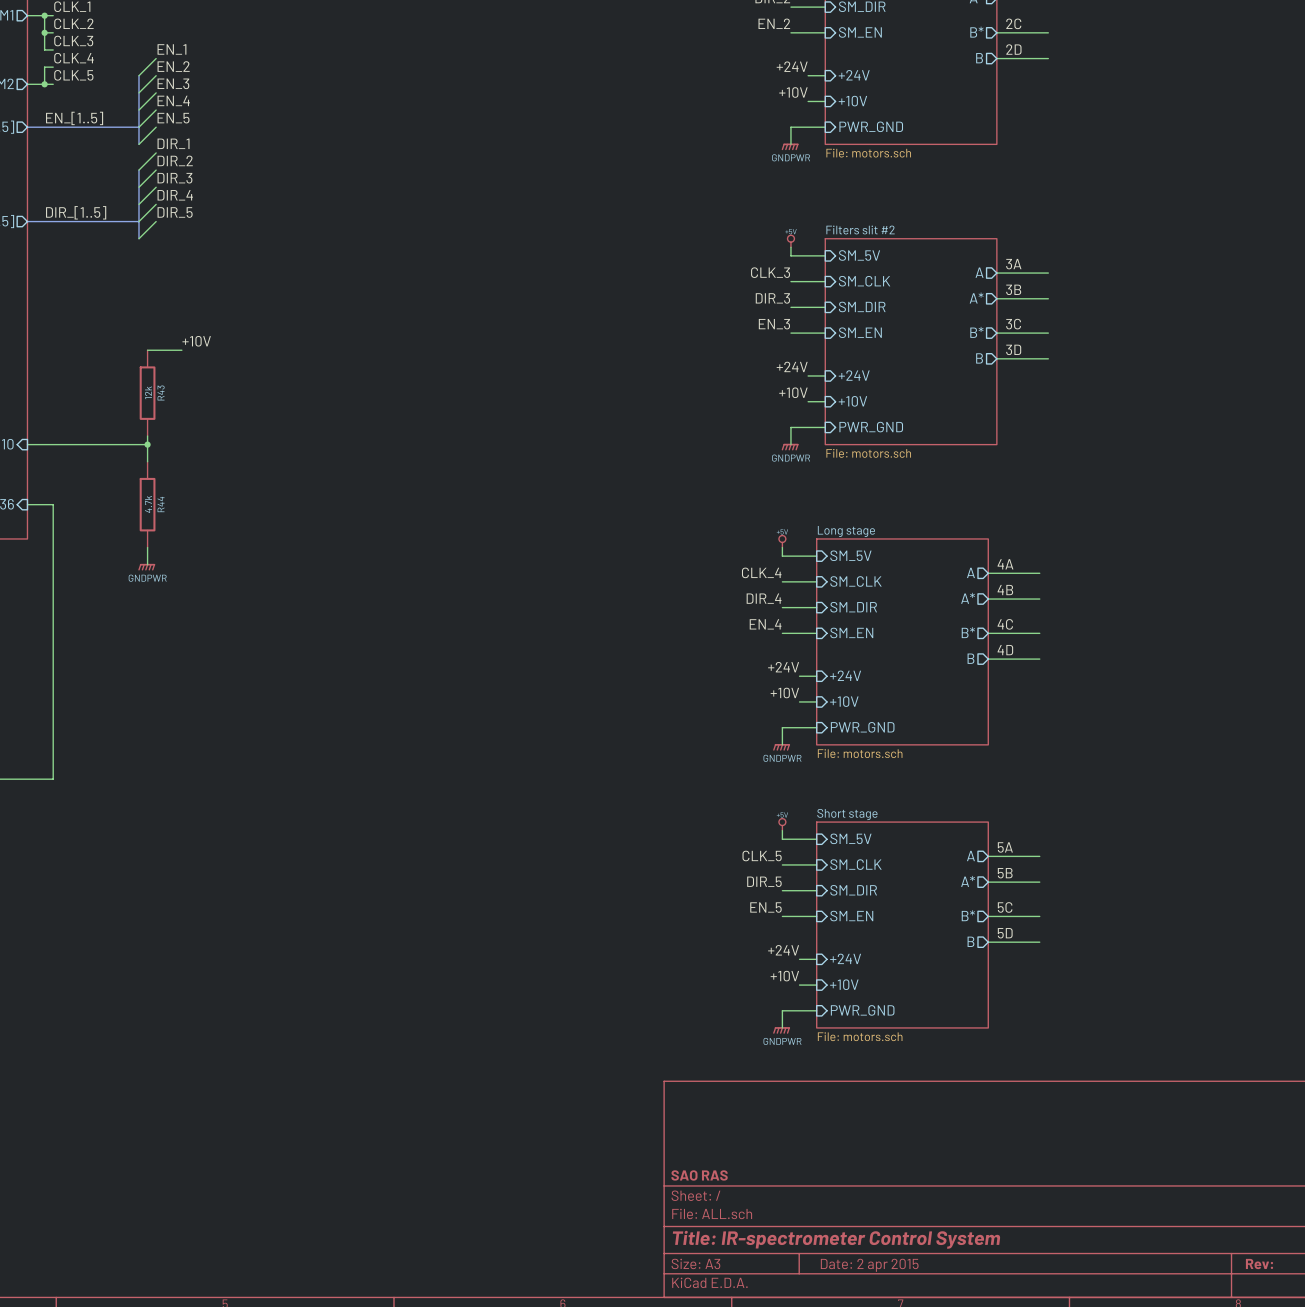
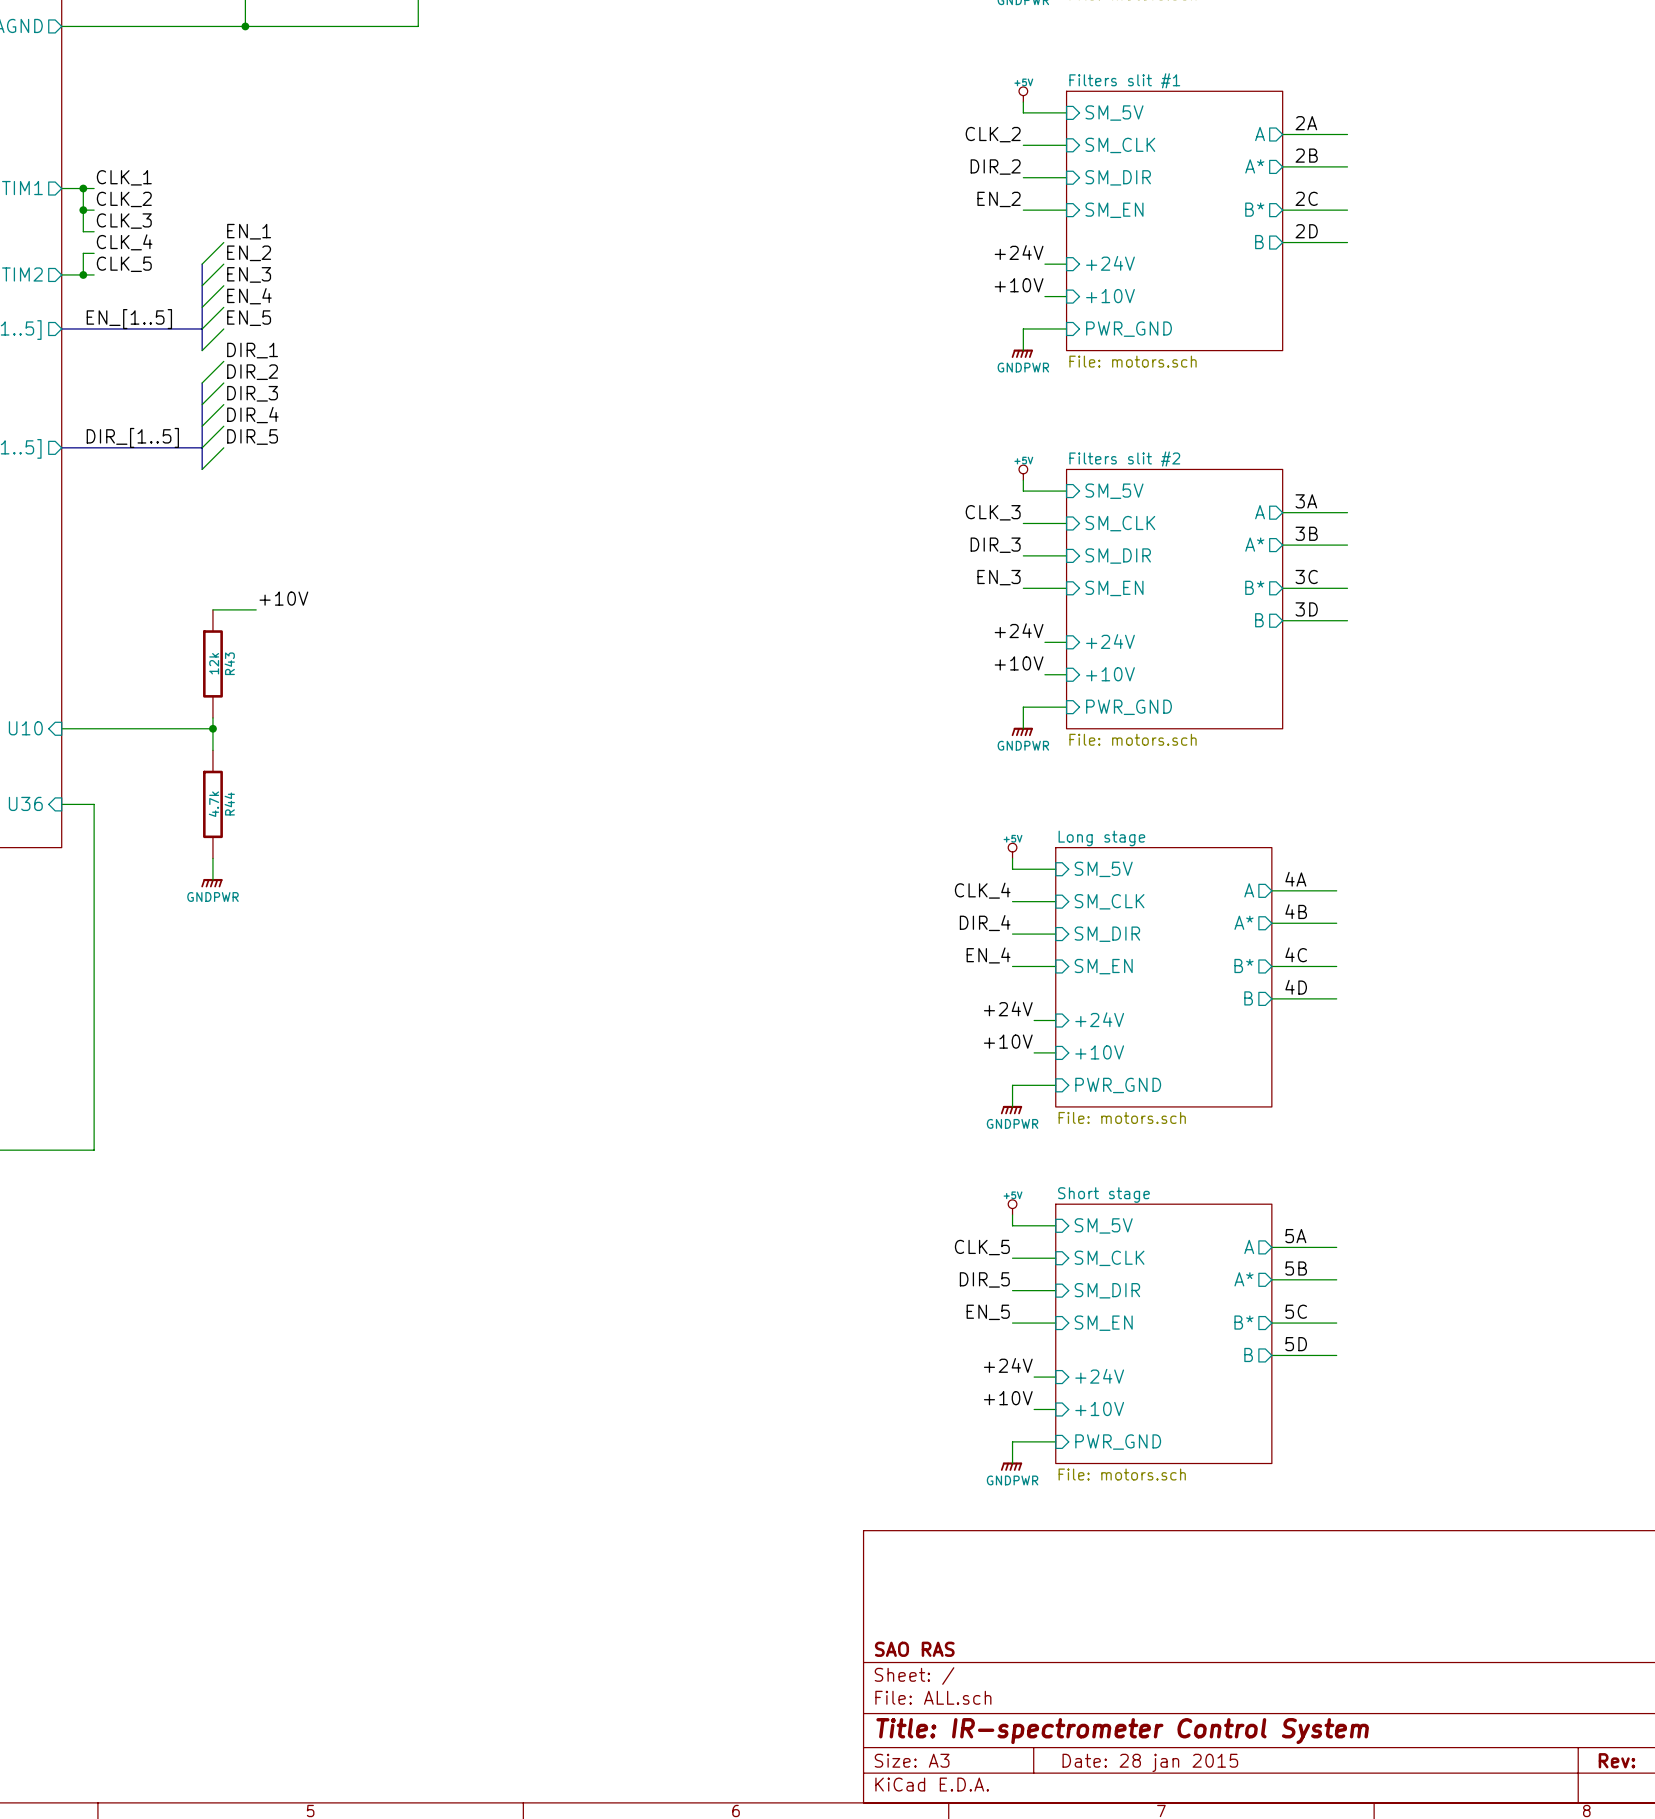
title block: Date: 2 apr 2015 (869, 1265) -> Date: 28 jan 2015 (1150, 1762)

